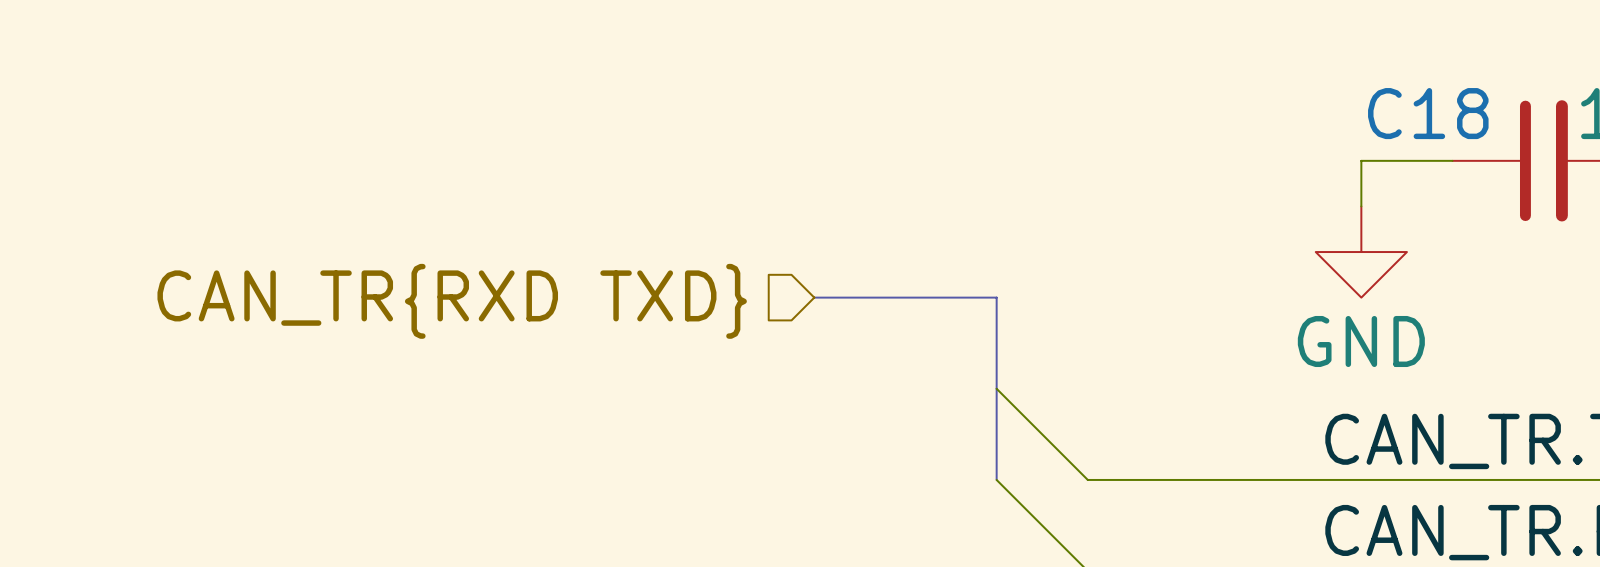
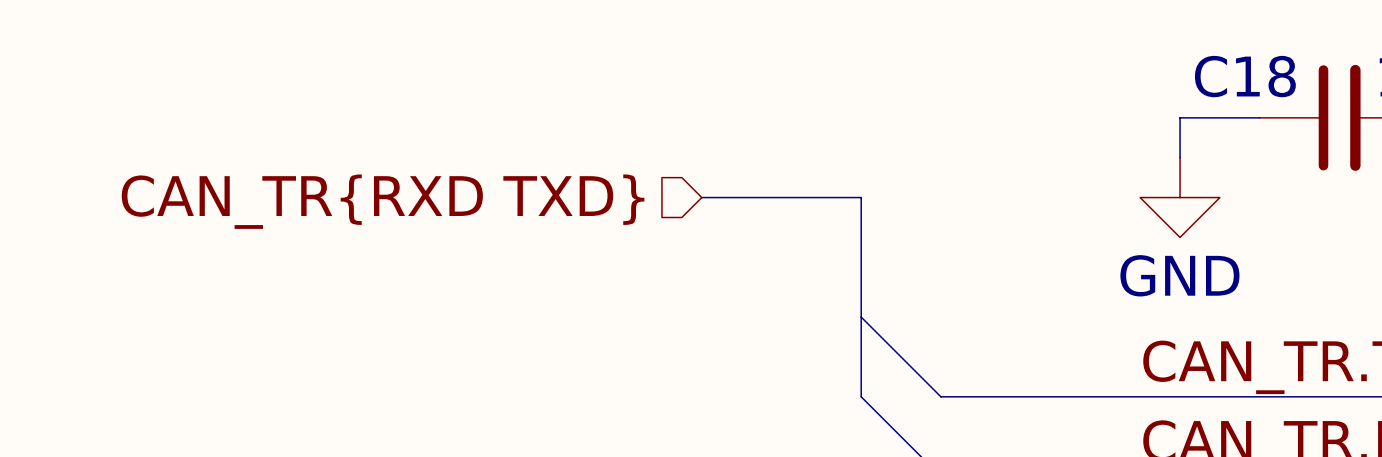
bus: (814, 297) (996, 297) -> (701, 197) (861, 197) (861, 237)
hierarchical label position: CAN_TR{RXD TXD} (452, 301) -> CAN_TR{RXD TXD} (383, 201)

